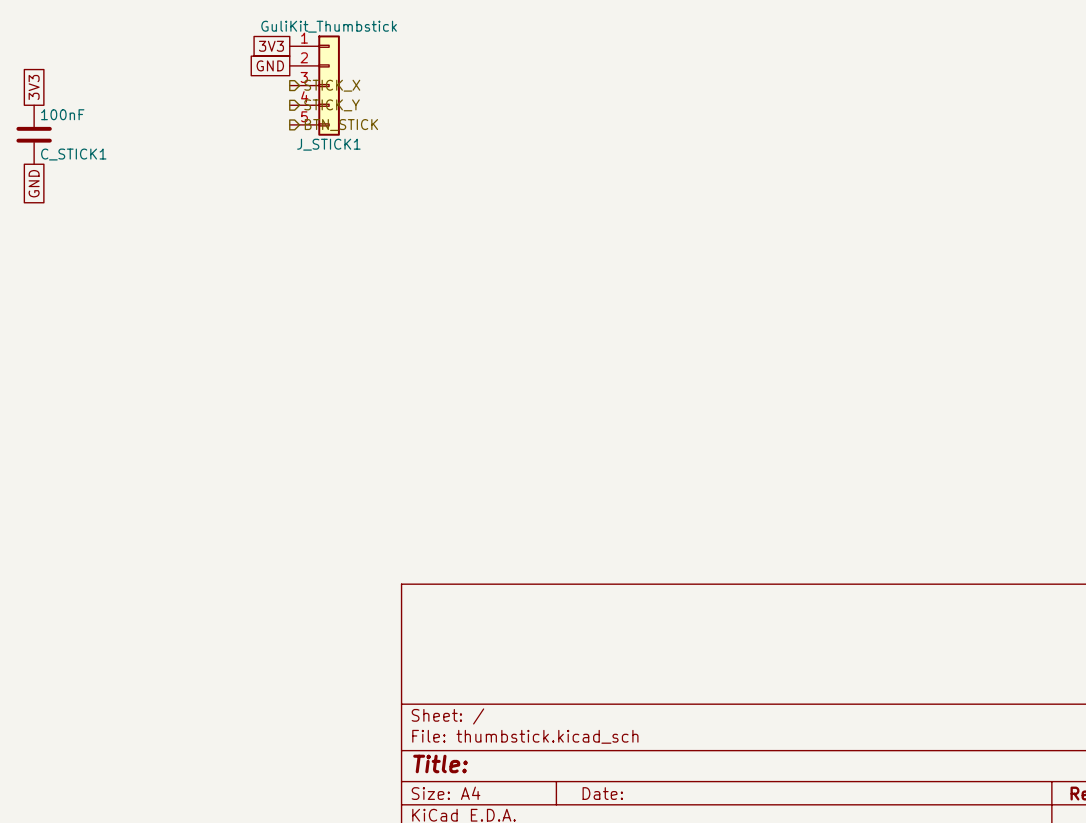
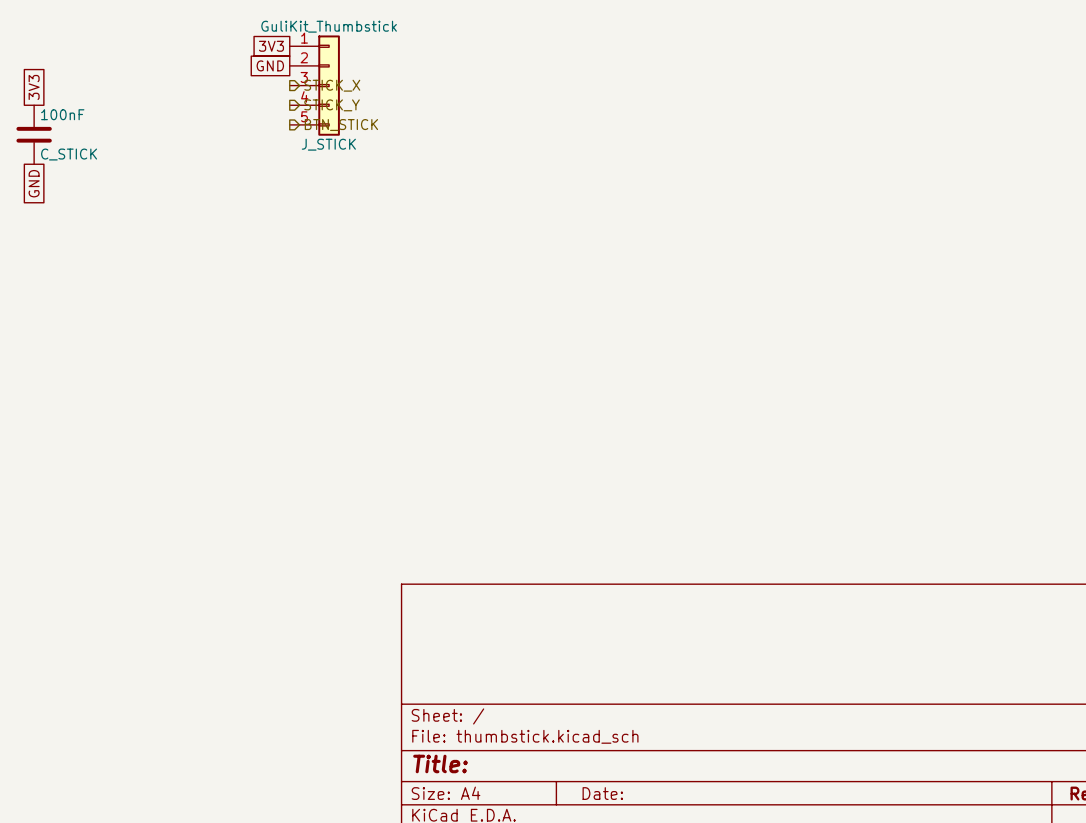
J_STICK1 name: J_STICK1 (328, 144) -> J_STICK (328, 144)
C_STICK1 name: C_STICK1 (73, 154) -> C_STICK (69, 154)

